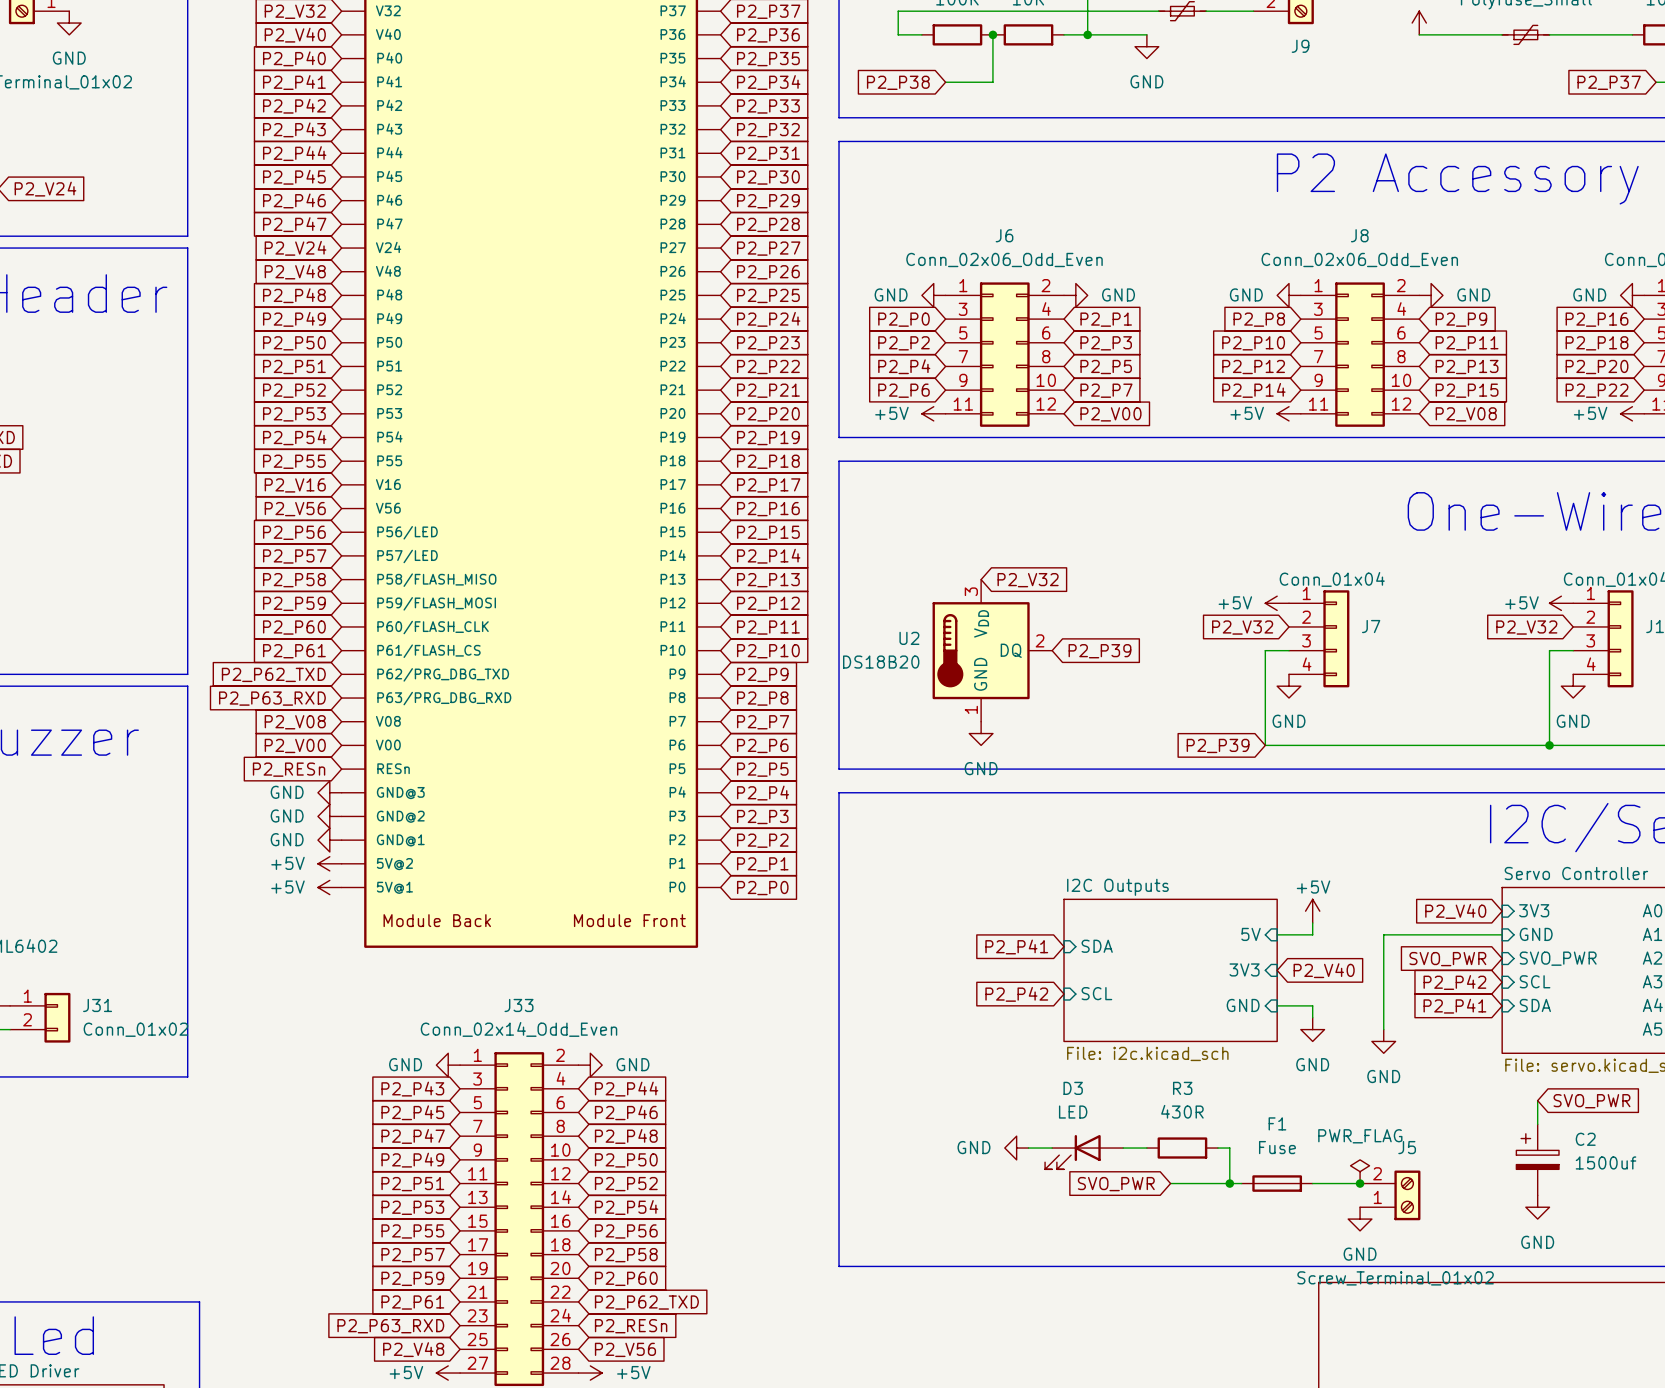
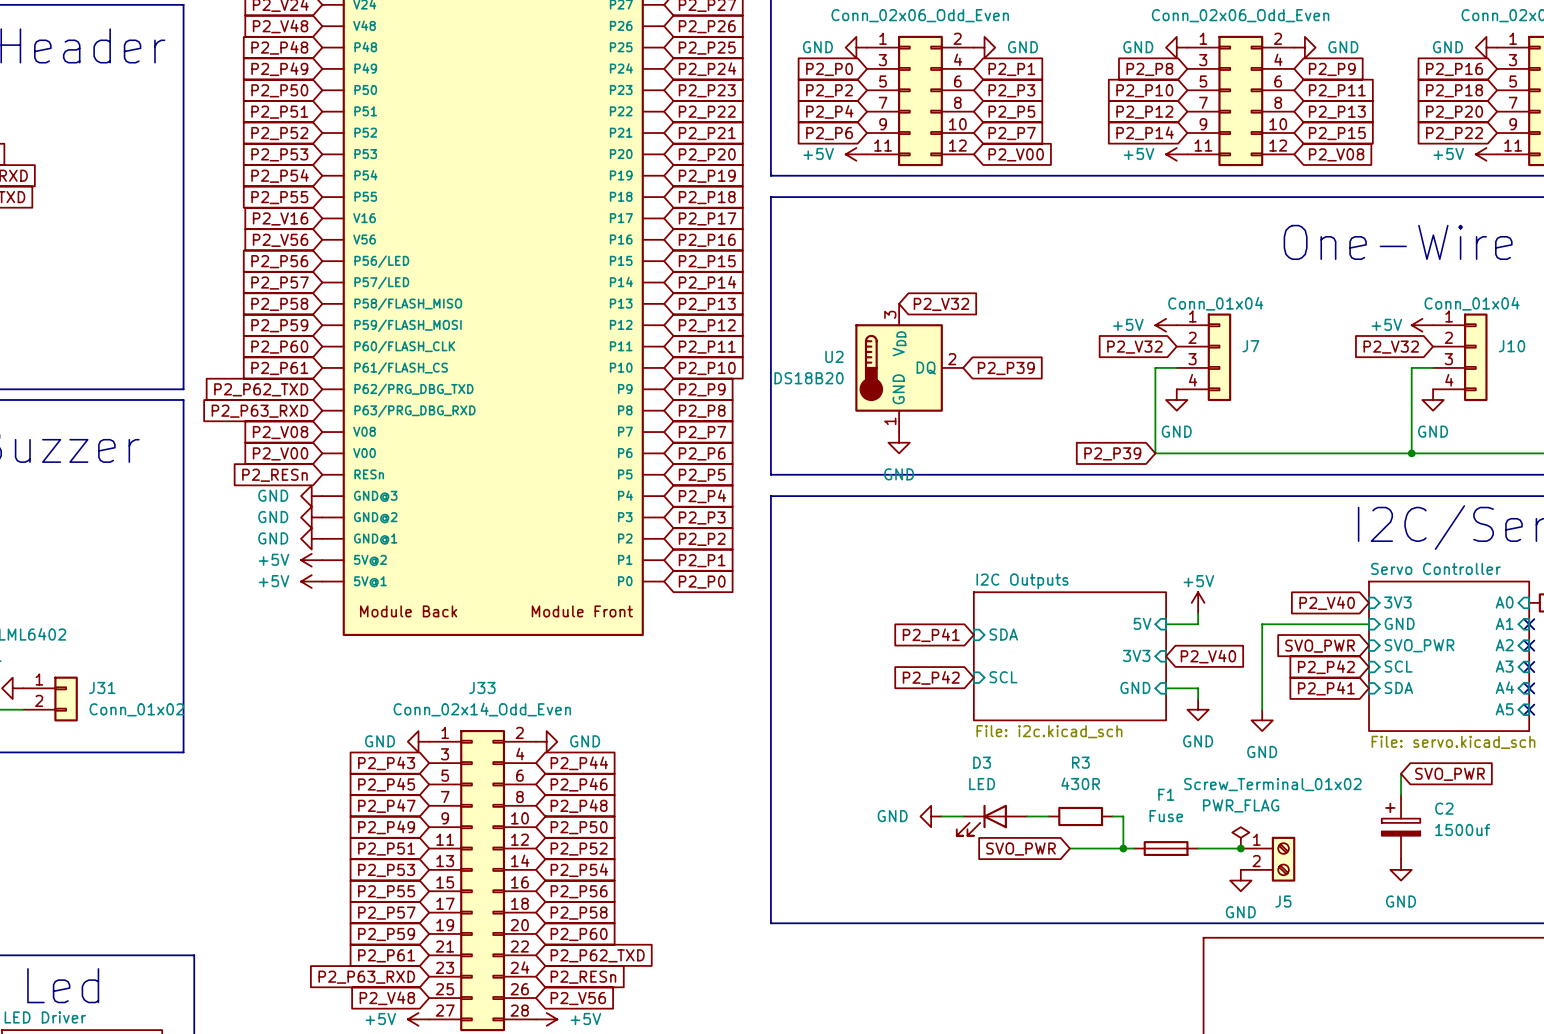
J5 flip: as is (1407, 1195) -> up-down (1283, 859)

